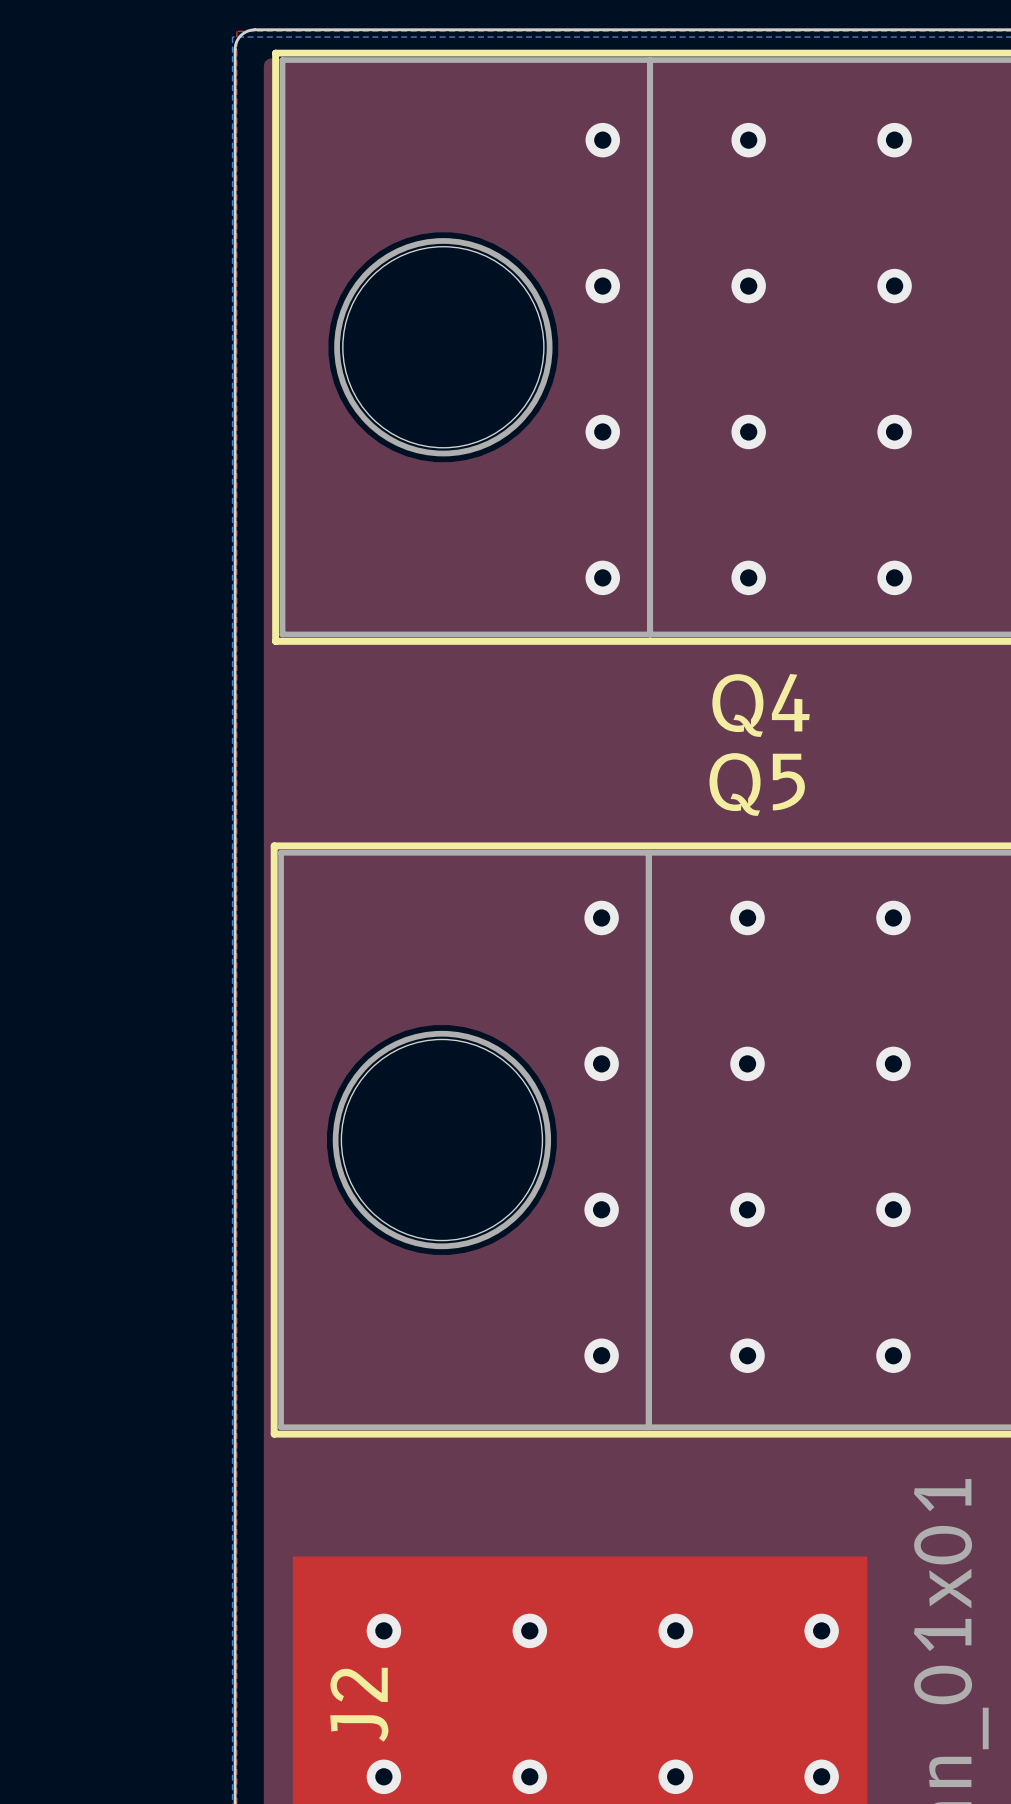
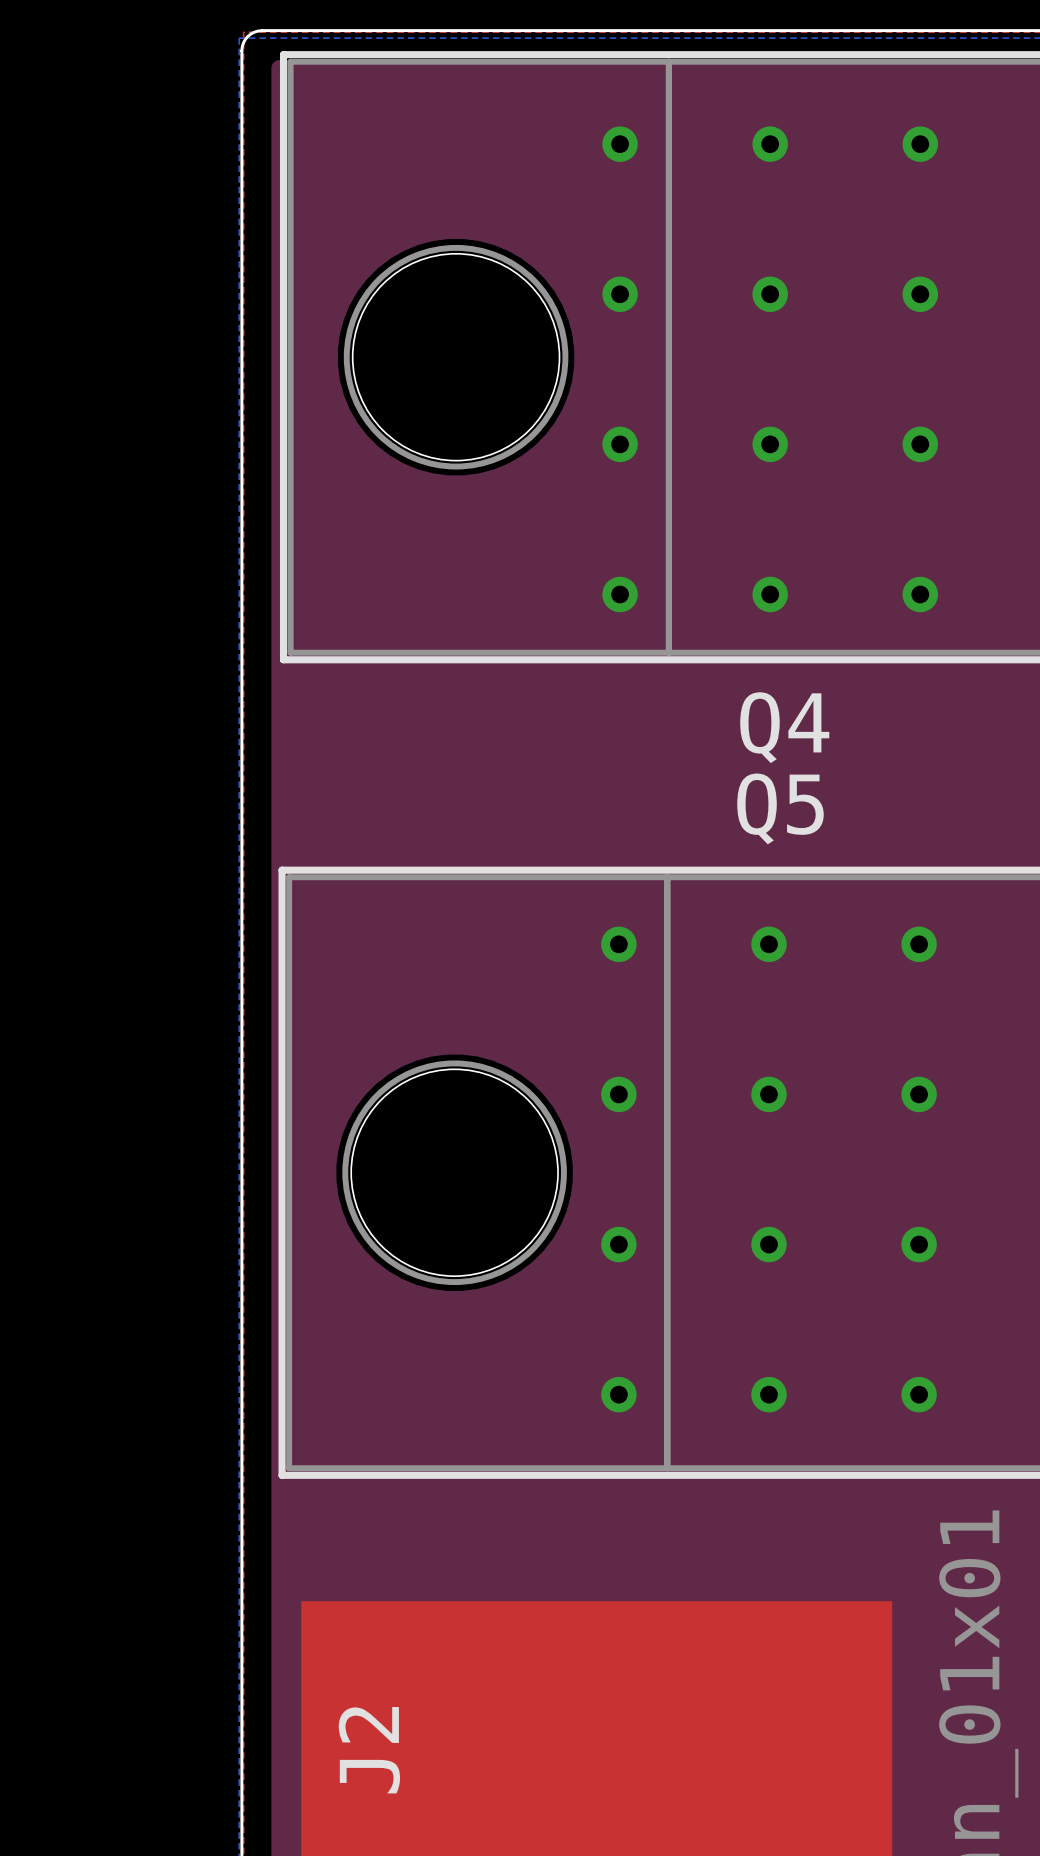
via: (383, 1630) -> none
via: (529, 1630) -> none
via: (675, 1630) -> none
via: (821, 1630) -> none
via: (383, 1776) -> none
via: (529, 1776) -> none
via: (675, 1776) -> none
via: (821, 1776) -> none

